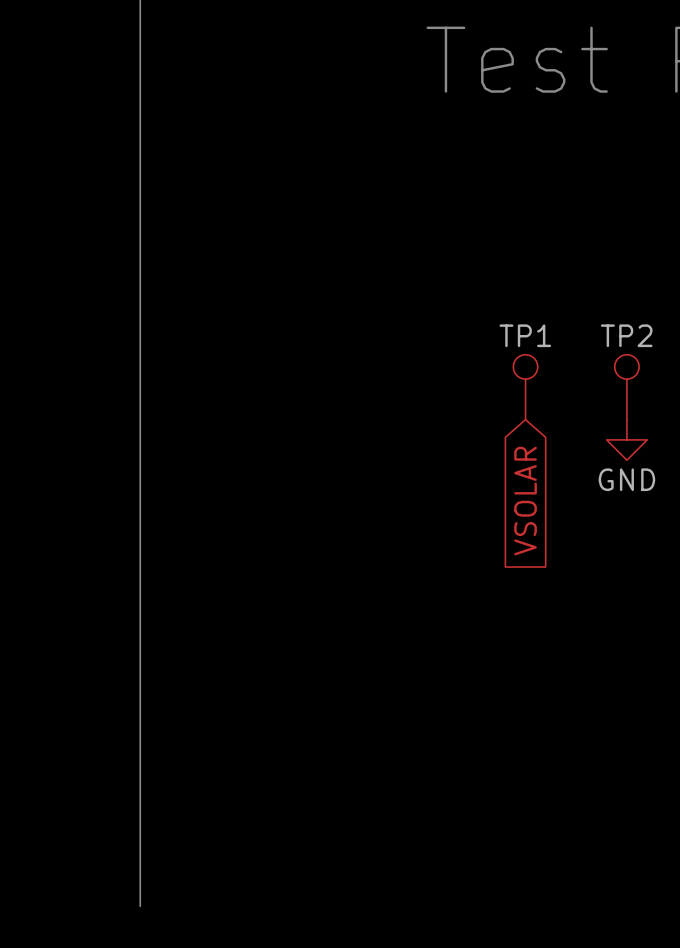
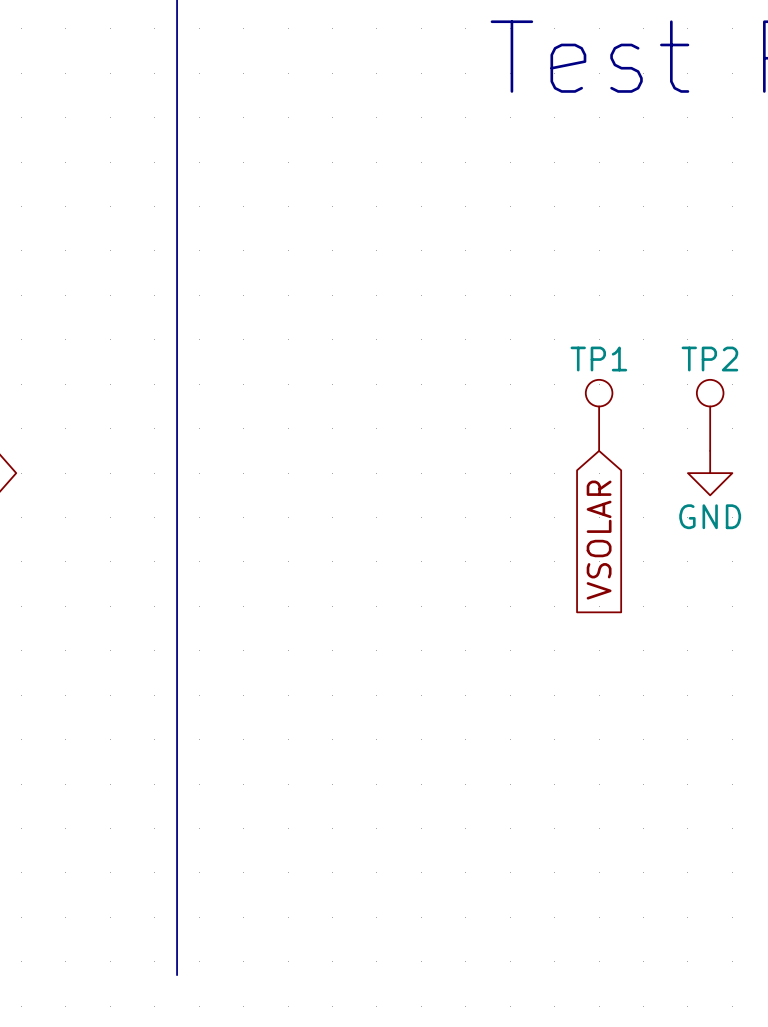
line: (140, 898) (140, 906) -> none

